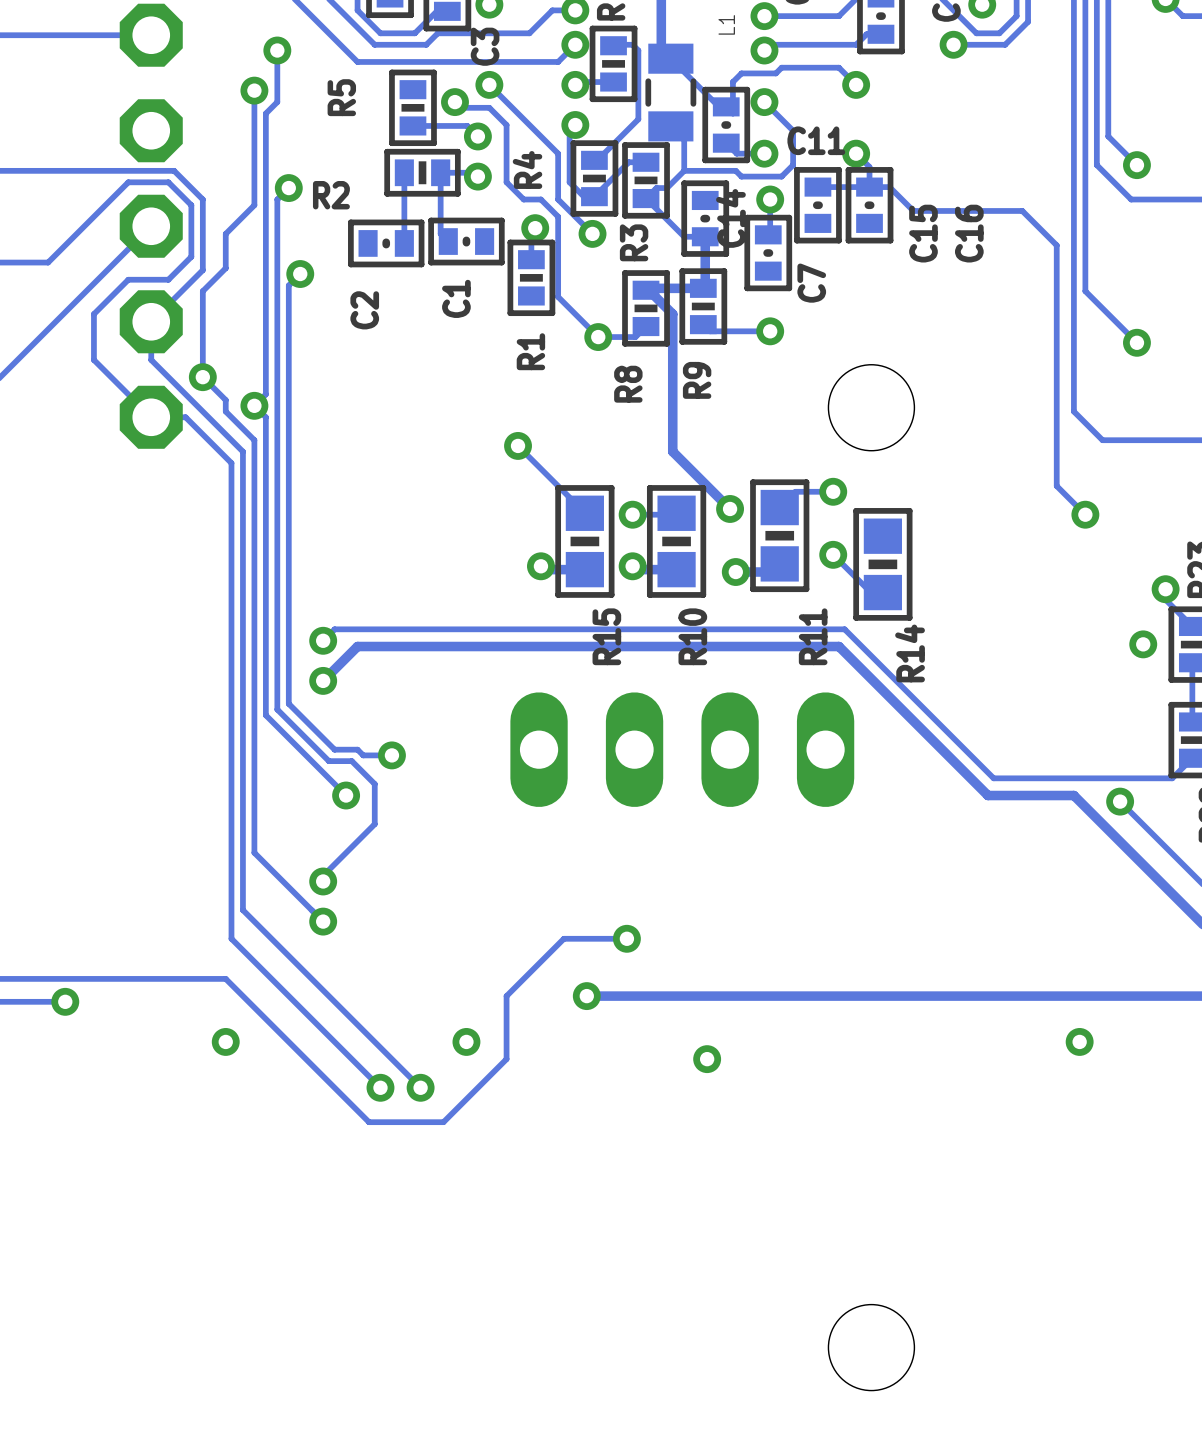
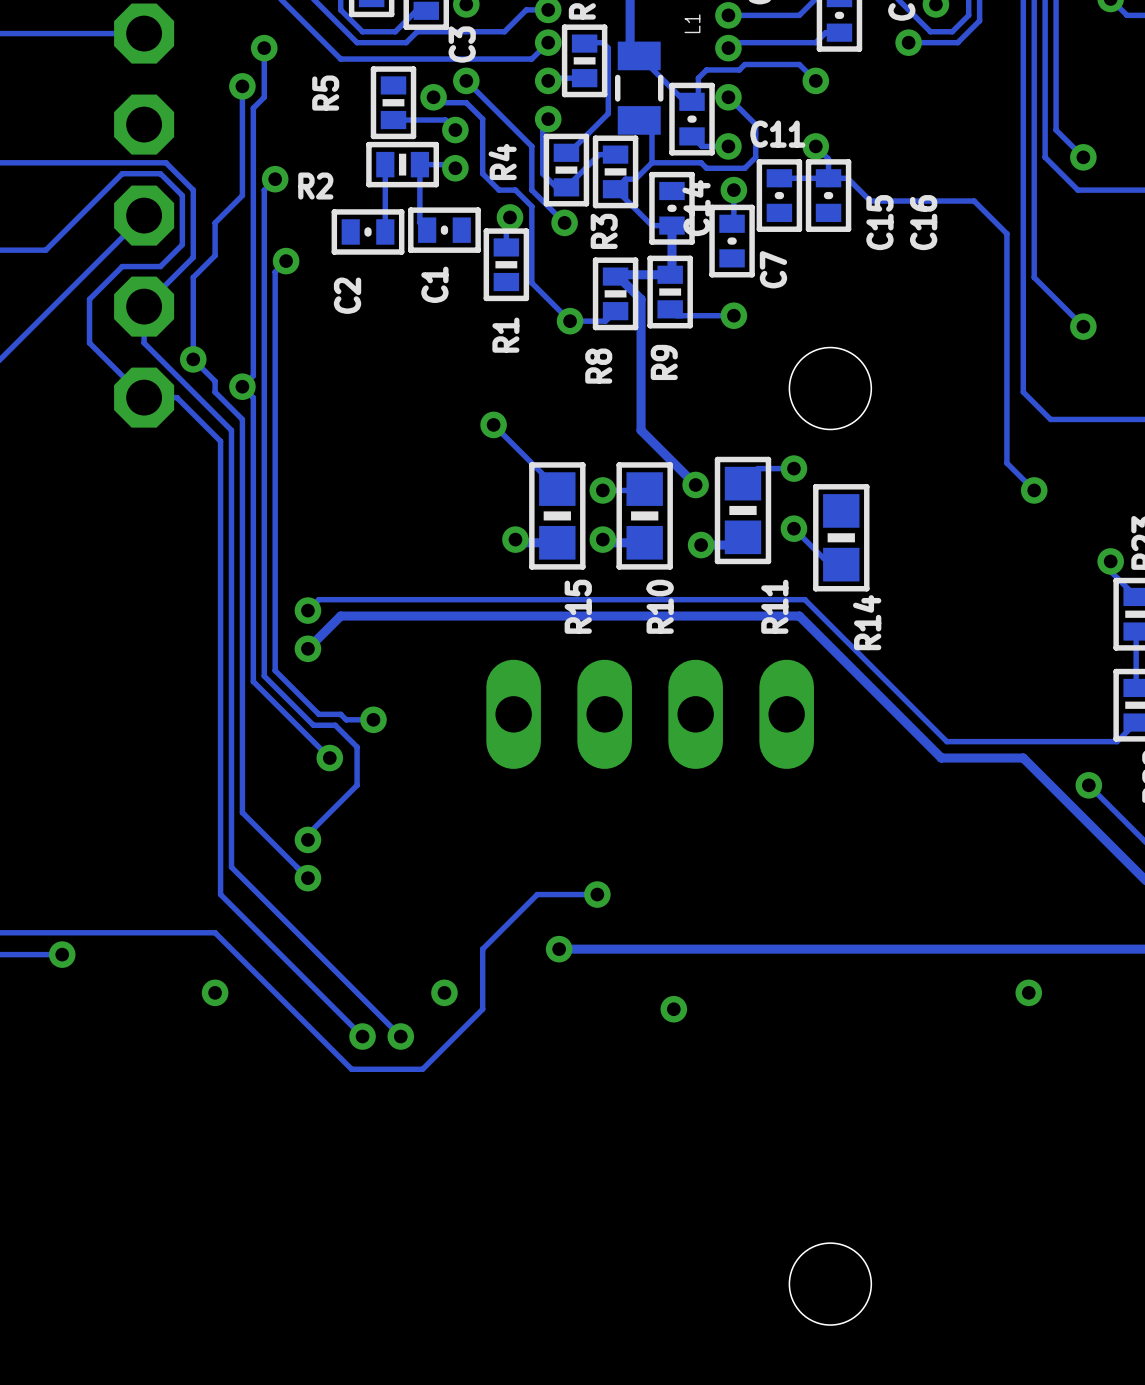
via: (1143, 644) -> none
track: (1120, 801) (1142, 824) -> none
via position: (1120, 801) -> (1088, 785)

